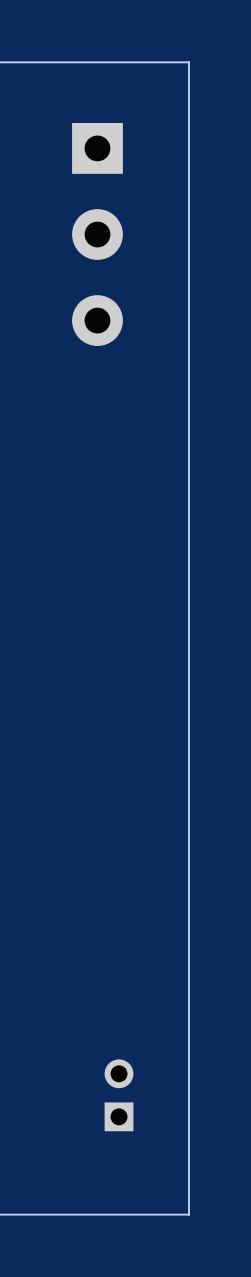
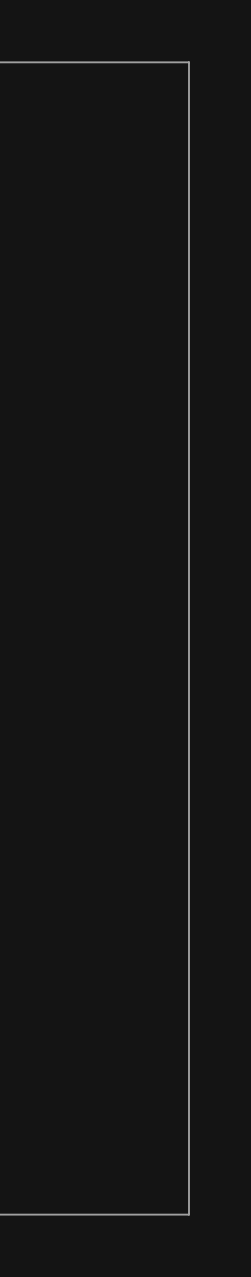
part: (97, 234) -> none
part: (119, 1095) -> none

